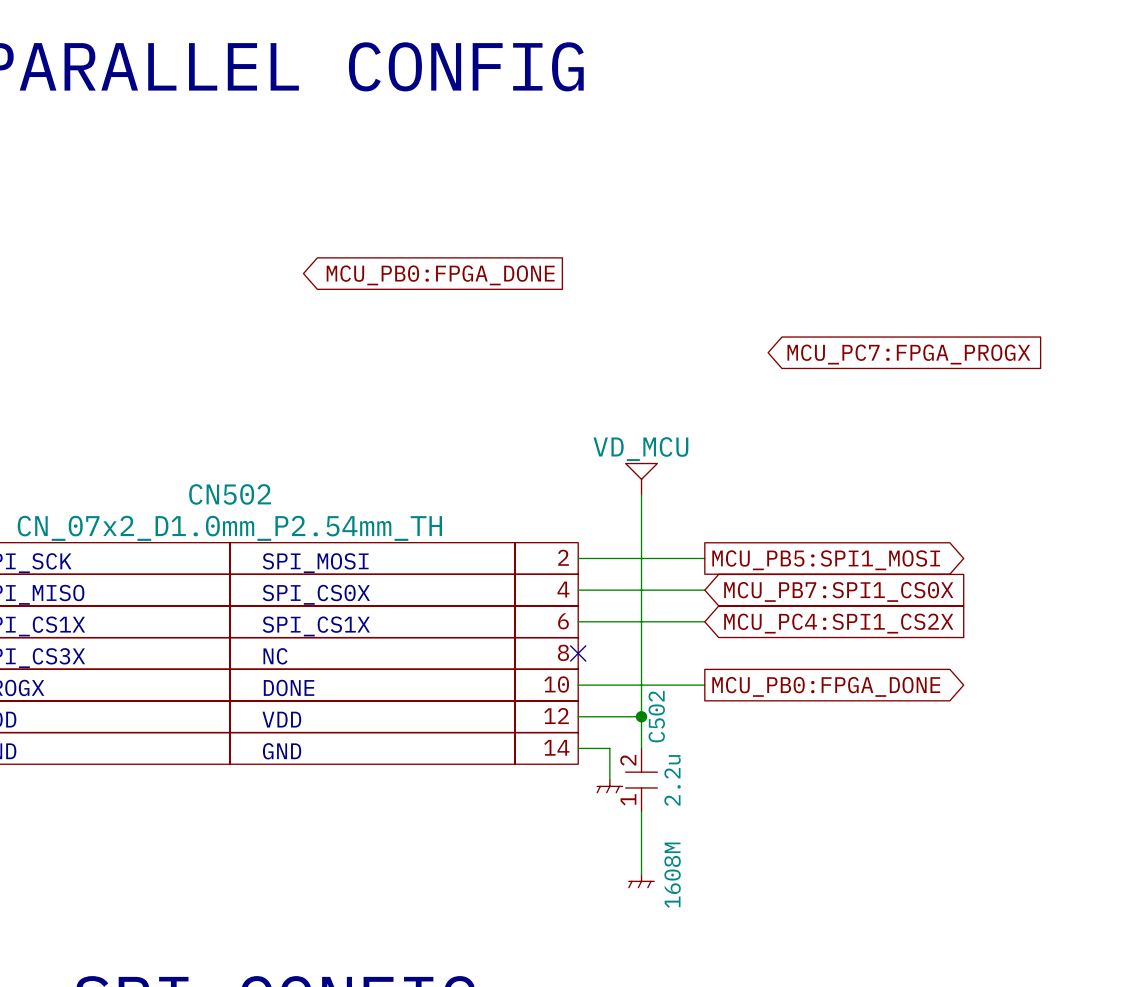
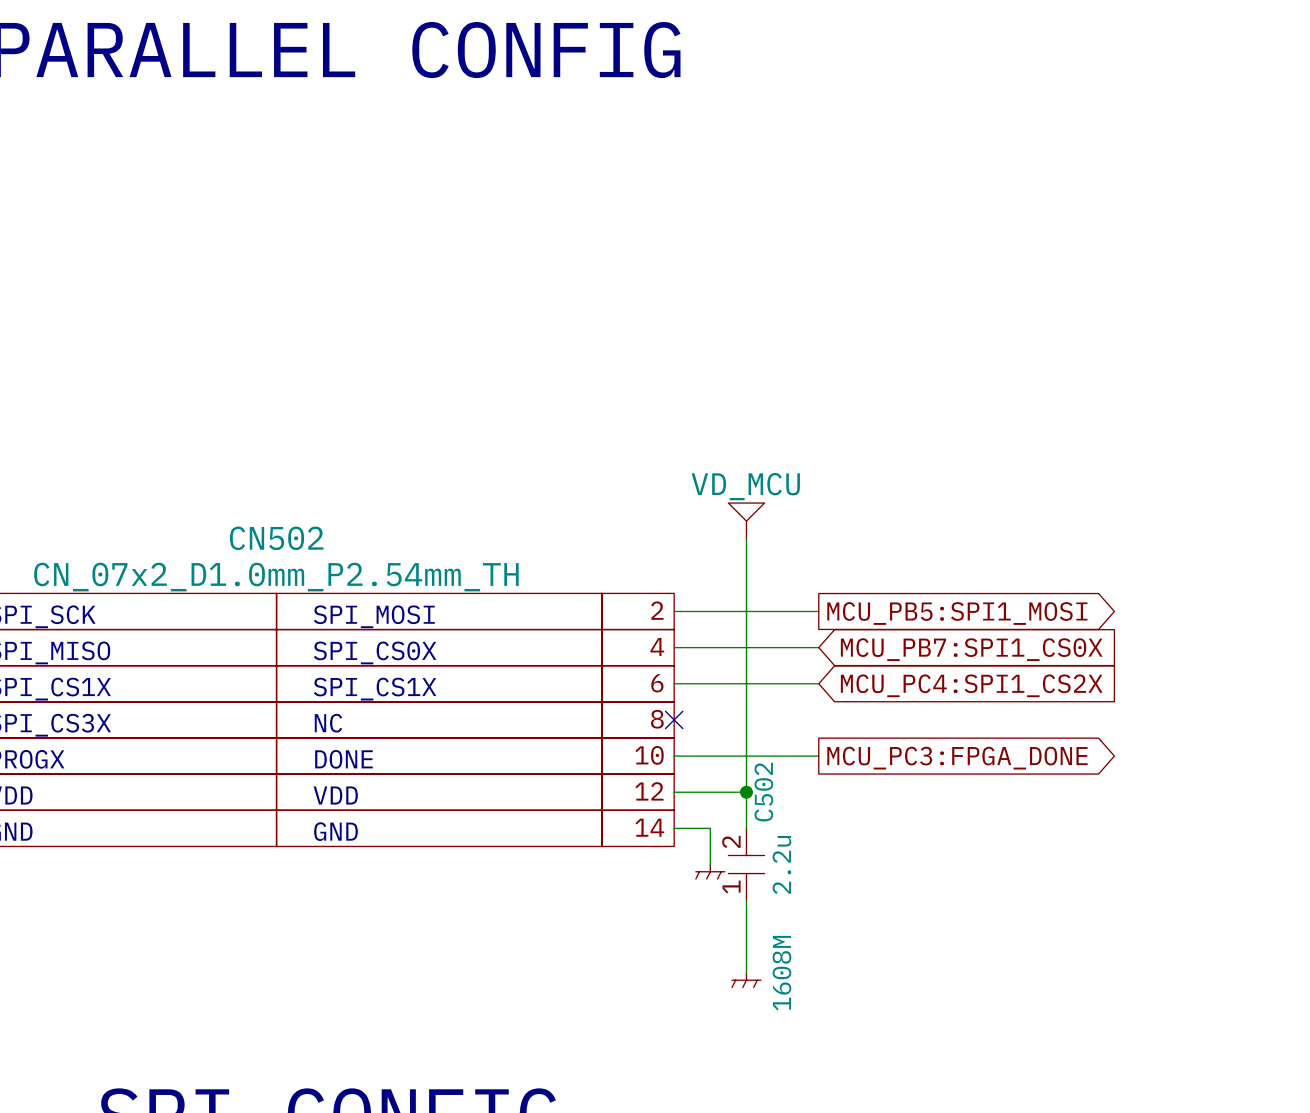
global label: MCU_PB0:FPGA_DONE (440, 275) -> none
global label: MCU_PC7:FPGA_PROGX (908, 354) -> none
global label: MCU_PB0:FPGA_DONE (826, 686) -> MCU_PC3:FPGA_DONE (957, 758)

